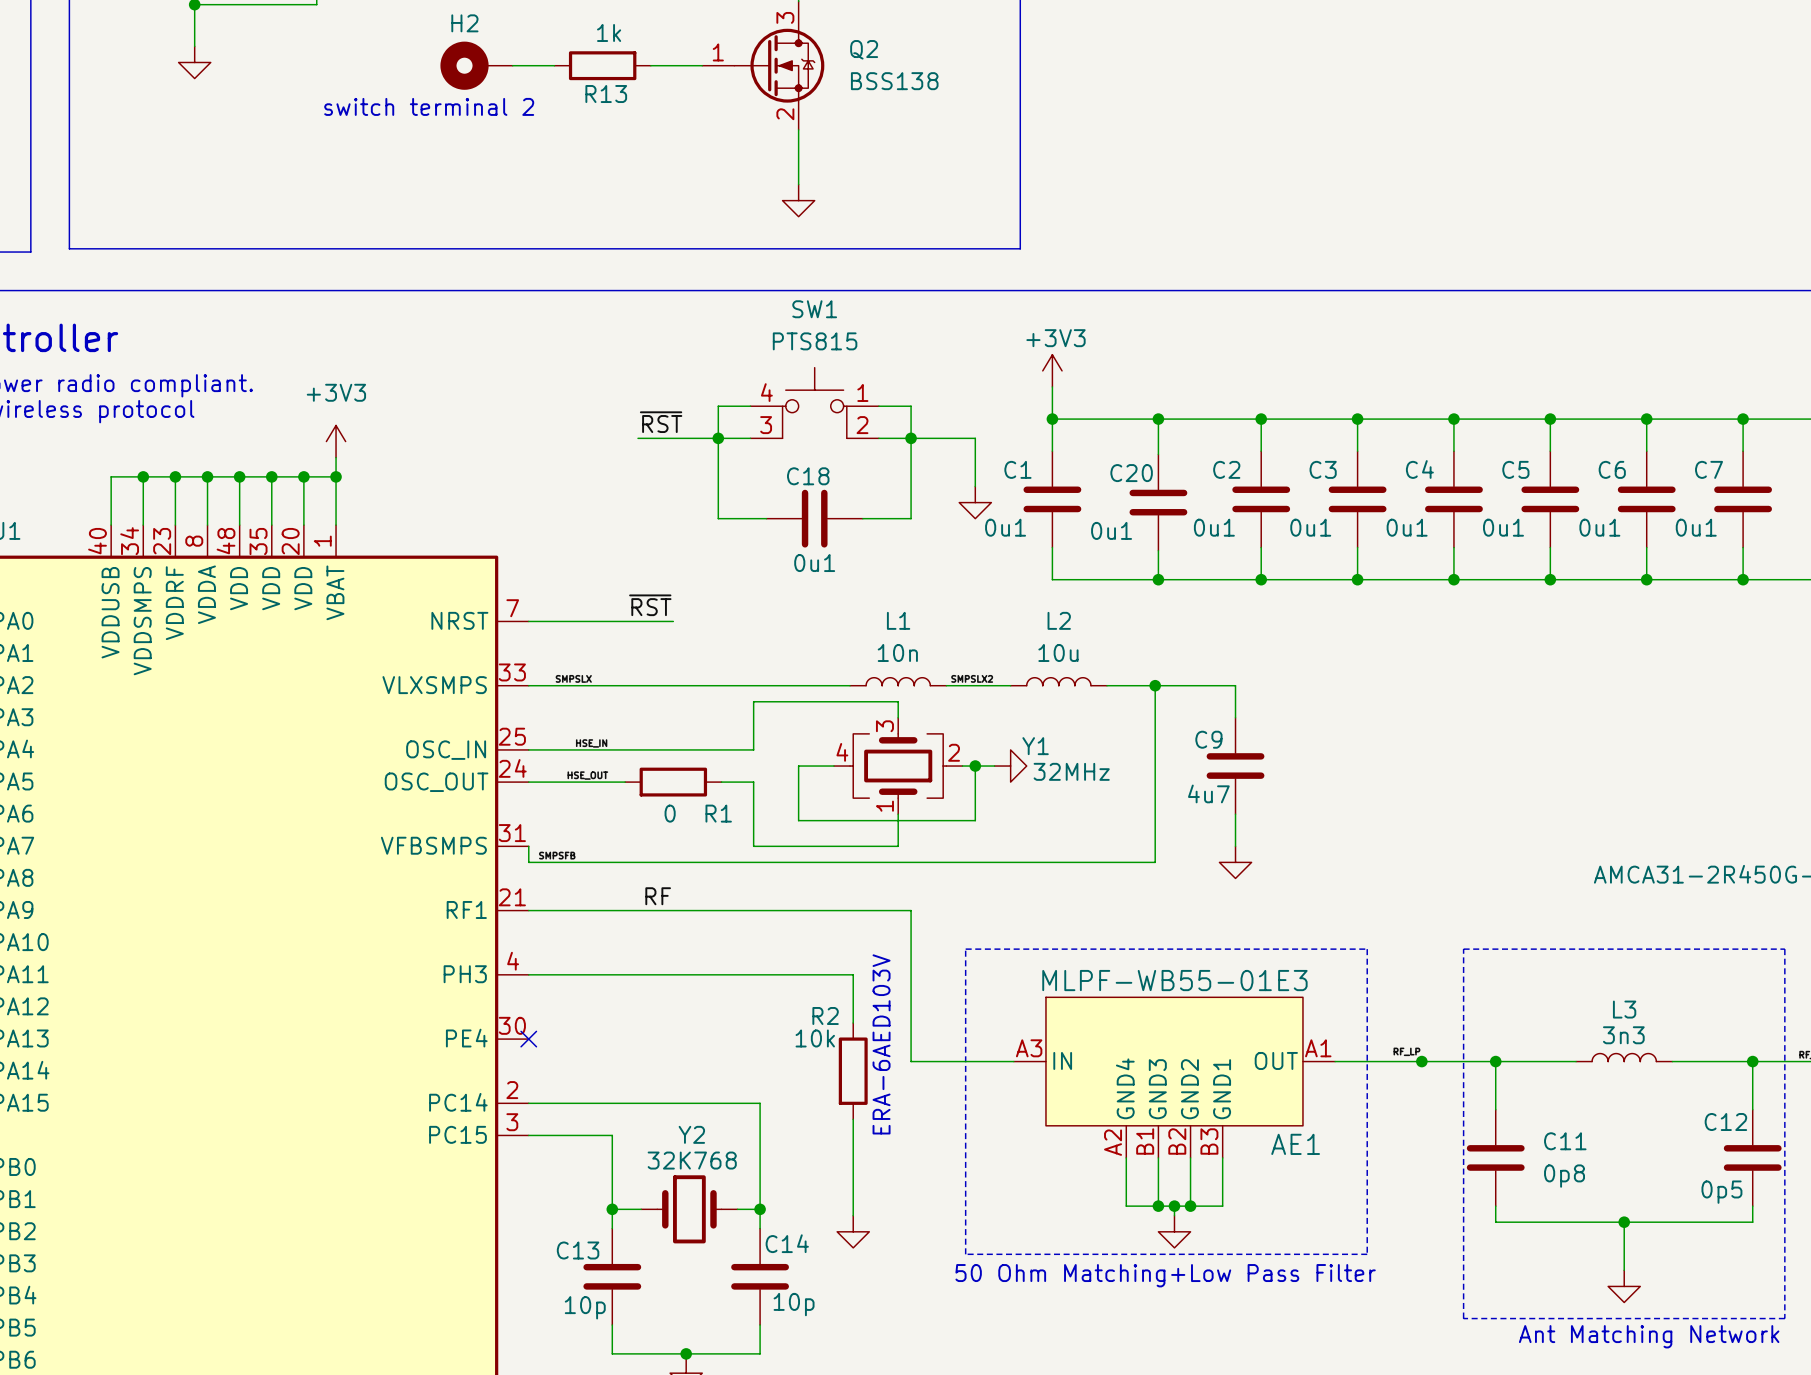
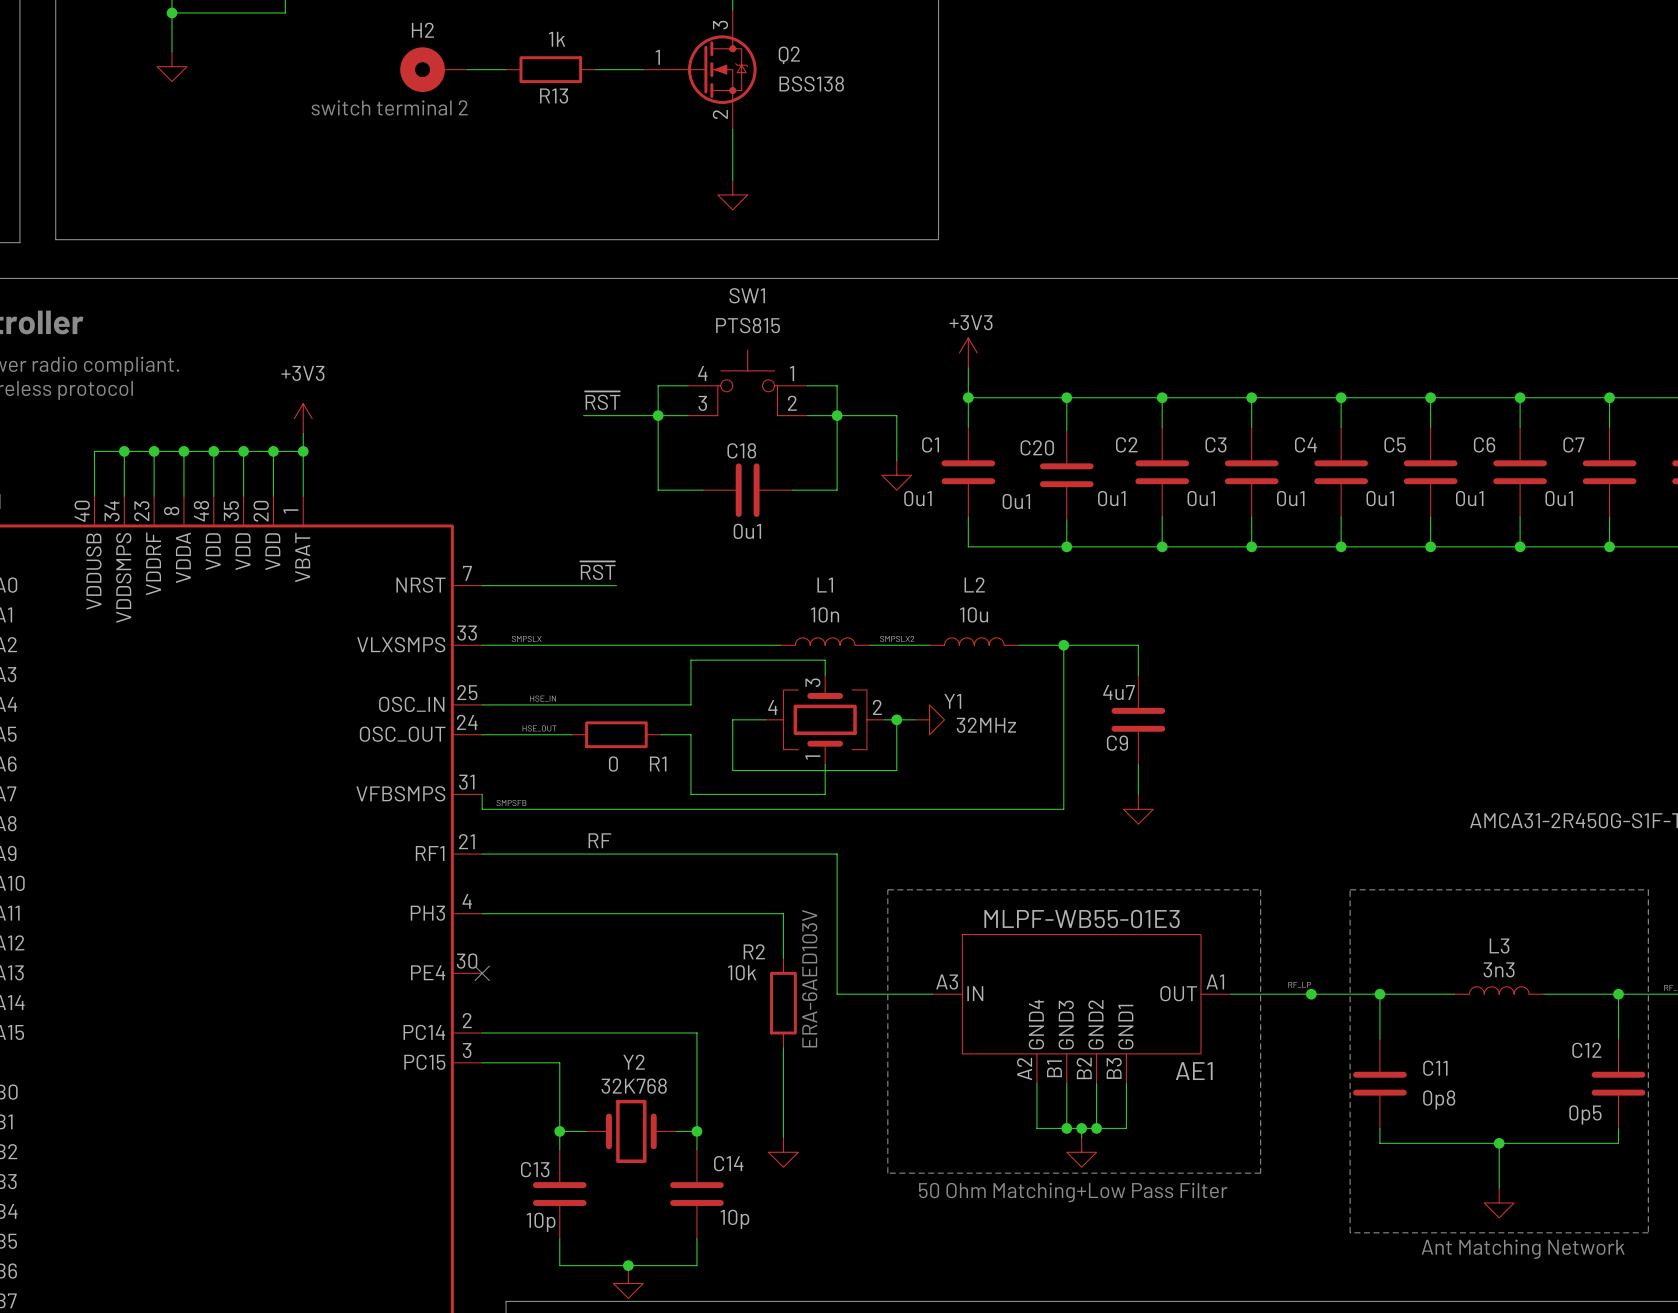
C9 name position: C9 (1208, 739) -> C9 (1117, 743)
C9 value position: 4u7 (1208, 793) -> 4u7 (1119, 692)

